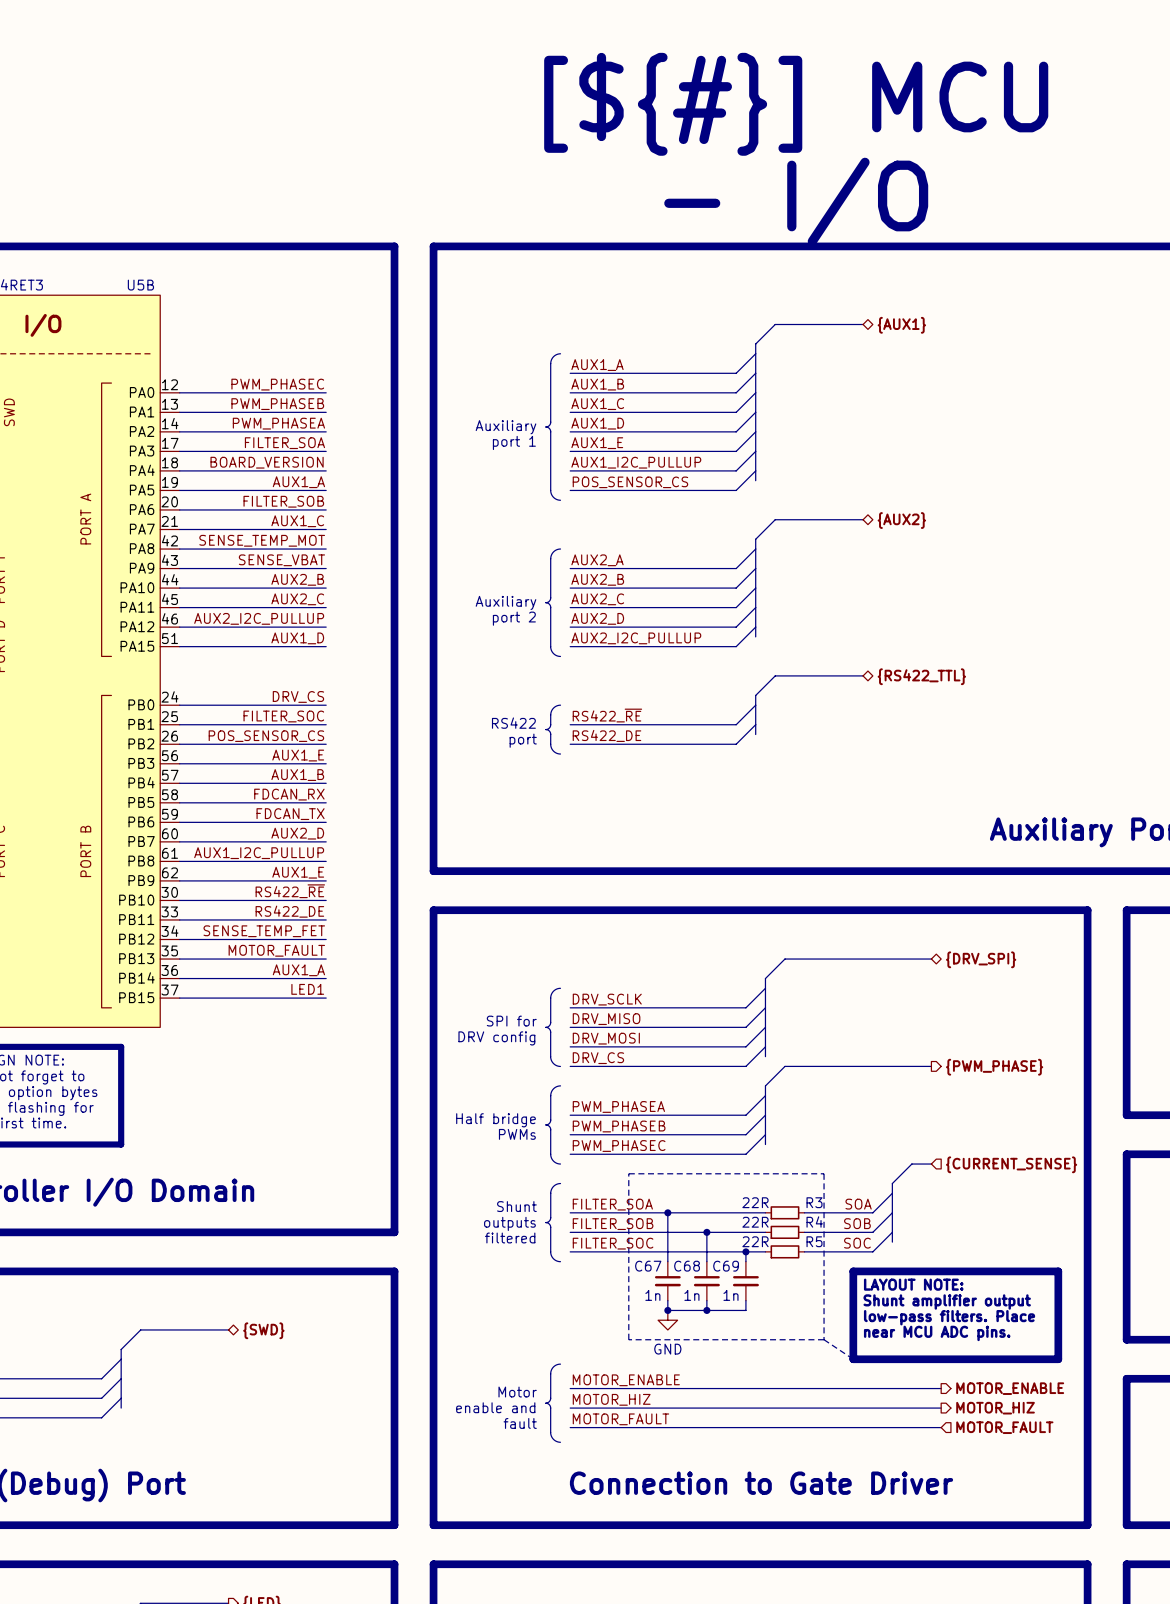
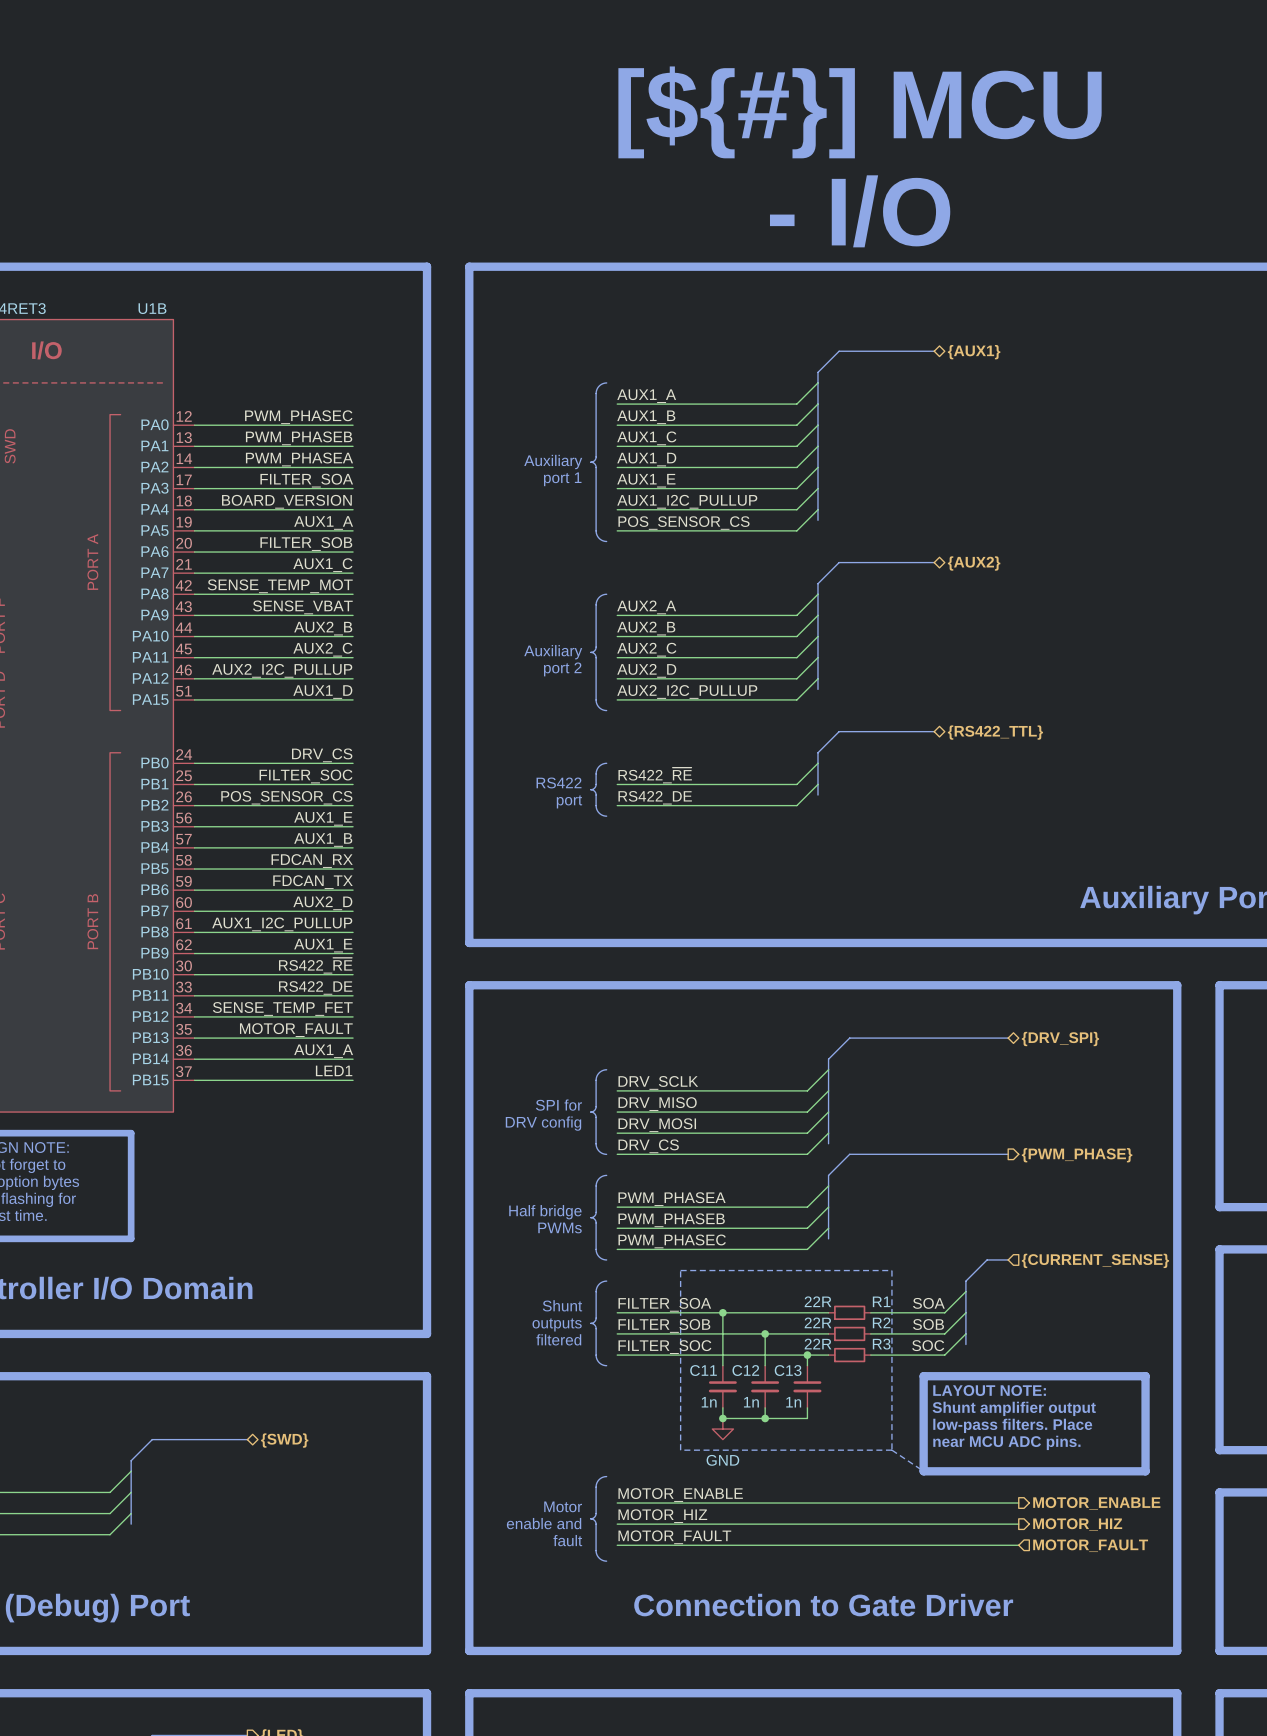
U5B name: U5B (140, 285) -> U1B (152, 308)
R3 name: R3 (814, 1202) -> R1 (881, 1301)
R4 name: R4 (814, 1221) -> R2 (881, 1322)
R5 name: R5 (814, 1241) -> R3 (881, 1344)
C67 name: C67 (648, 1266) -> C11 (703, 1370)
C68 name: C68 (687, 1266) -> C12 (745, 1370)
C69 name: C69 (726, 1266) -> C13 (788, 1370)

